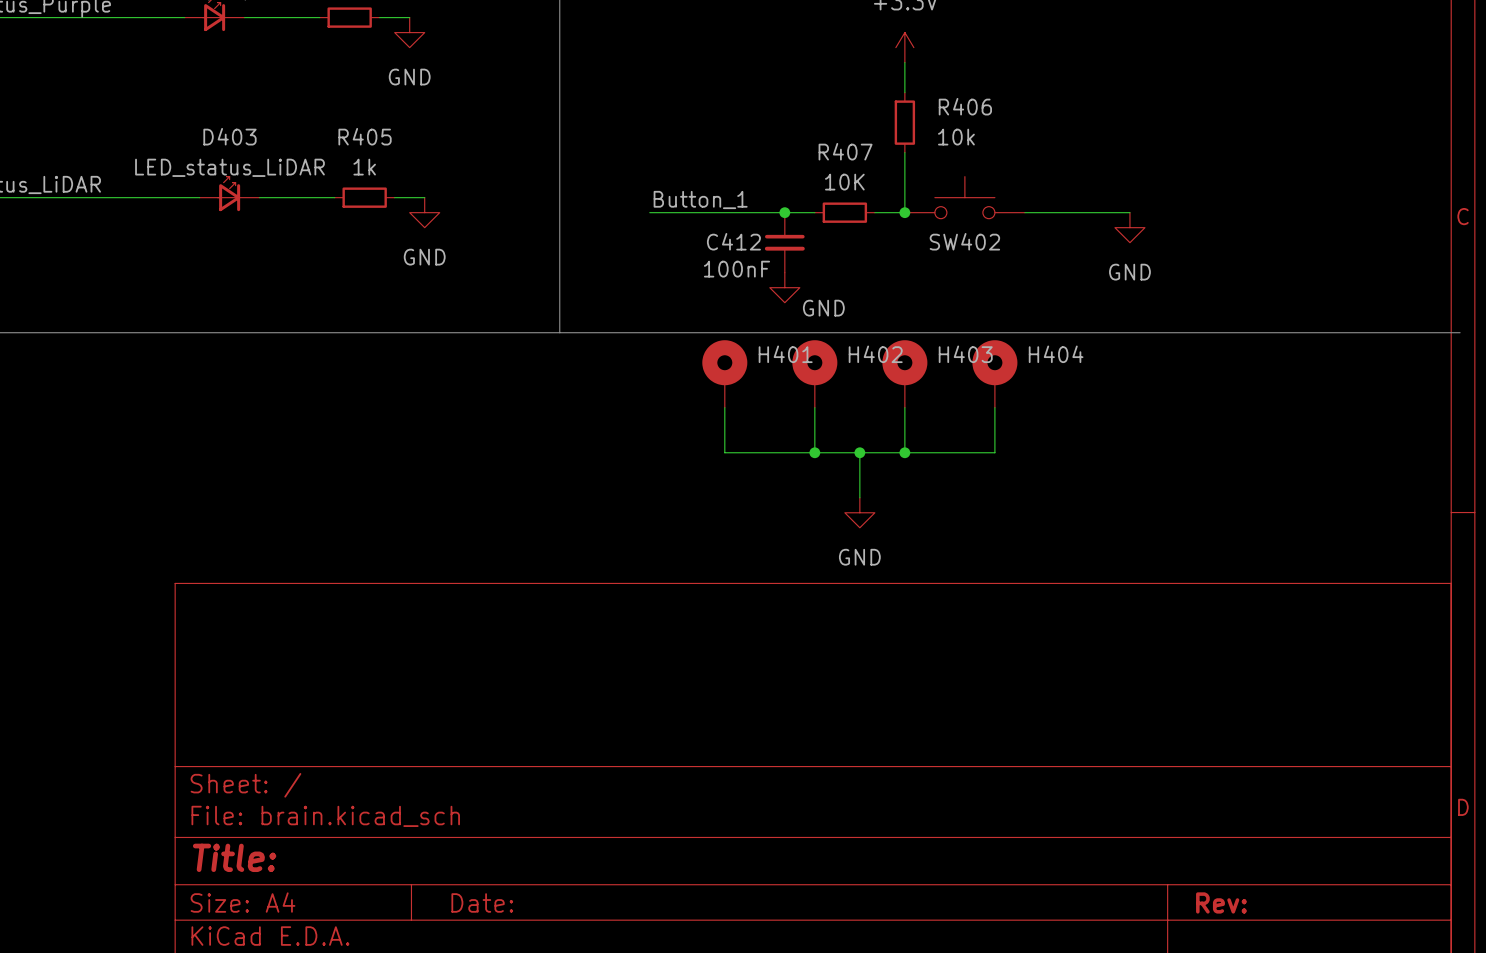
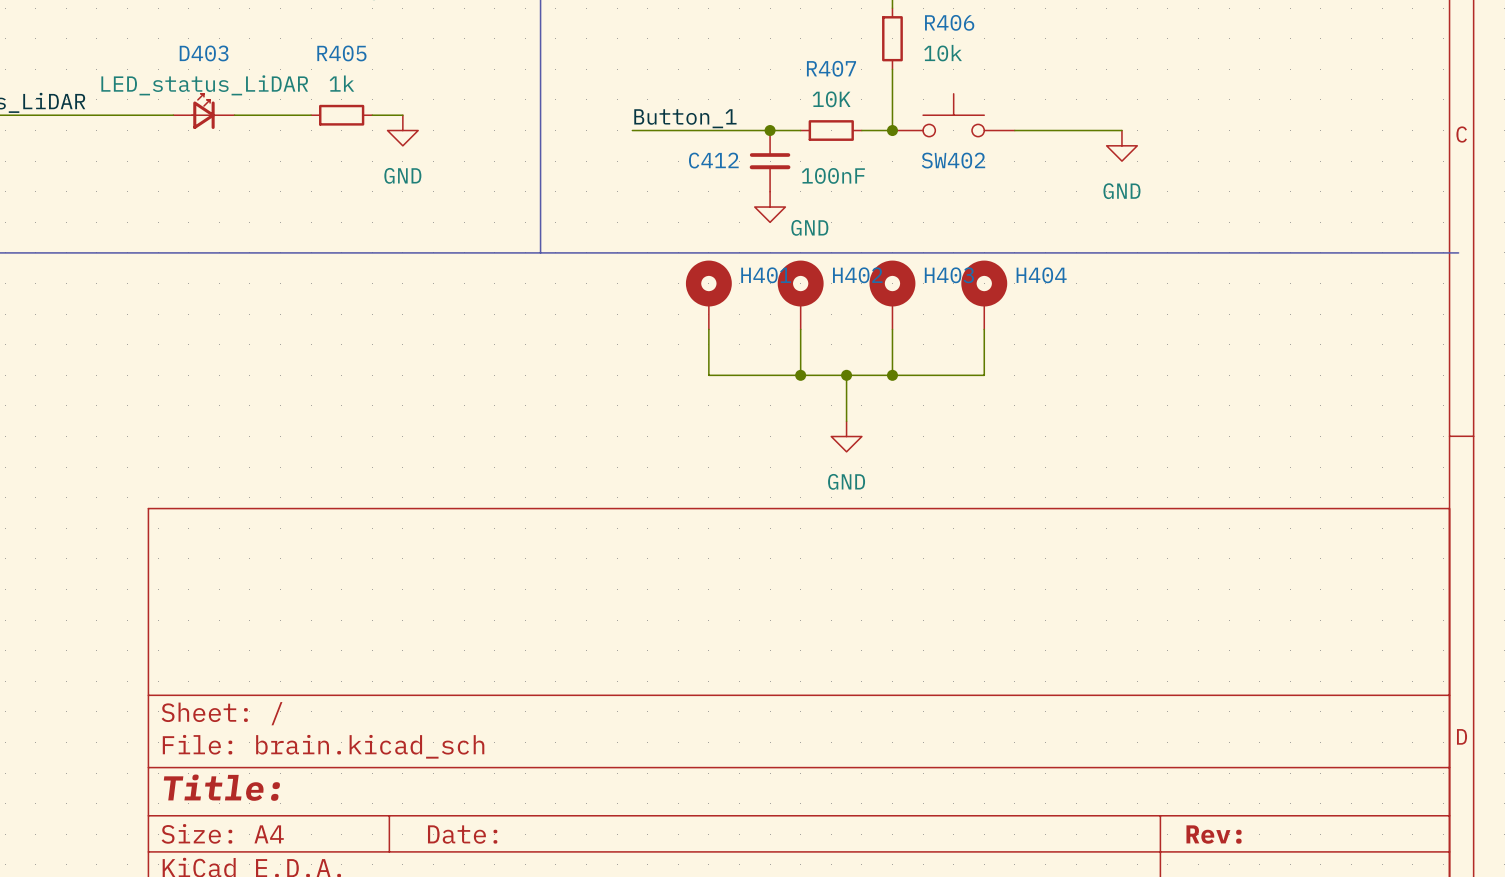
C412 value position: 100nF (736, 269) -> 100nF (833, 175)

